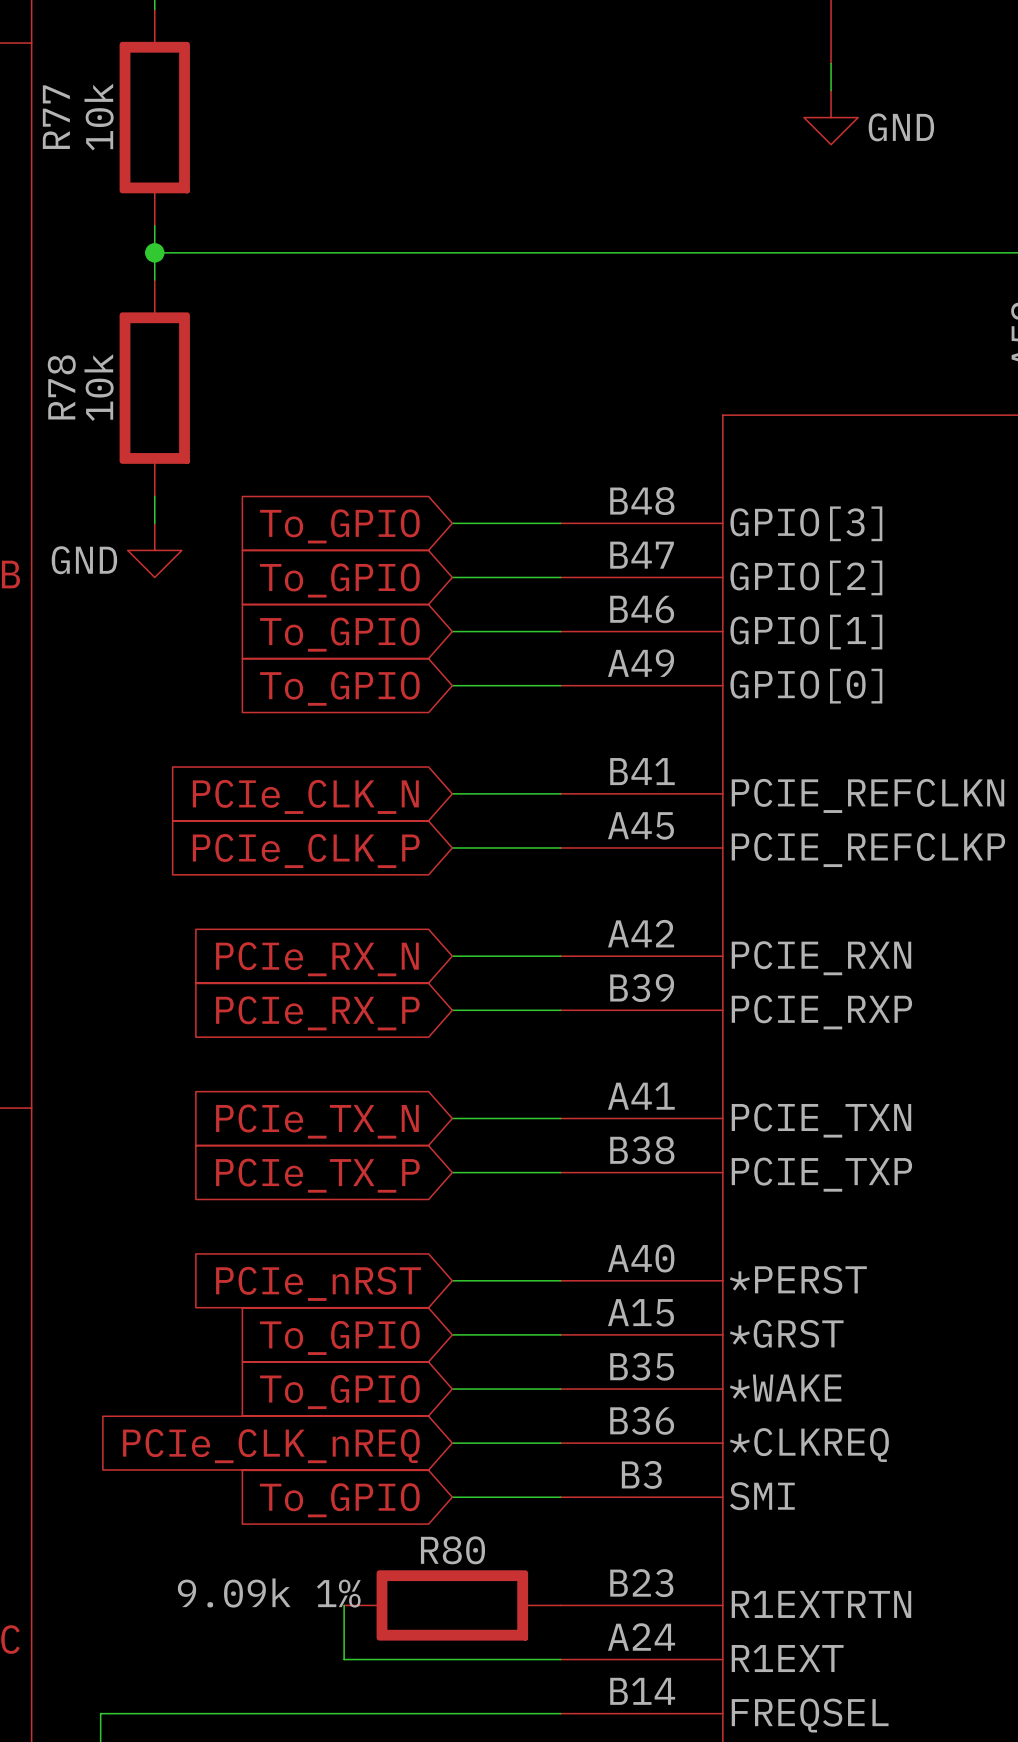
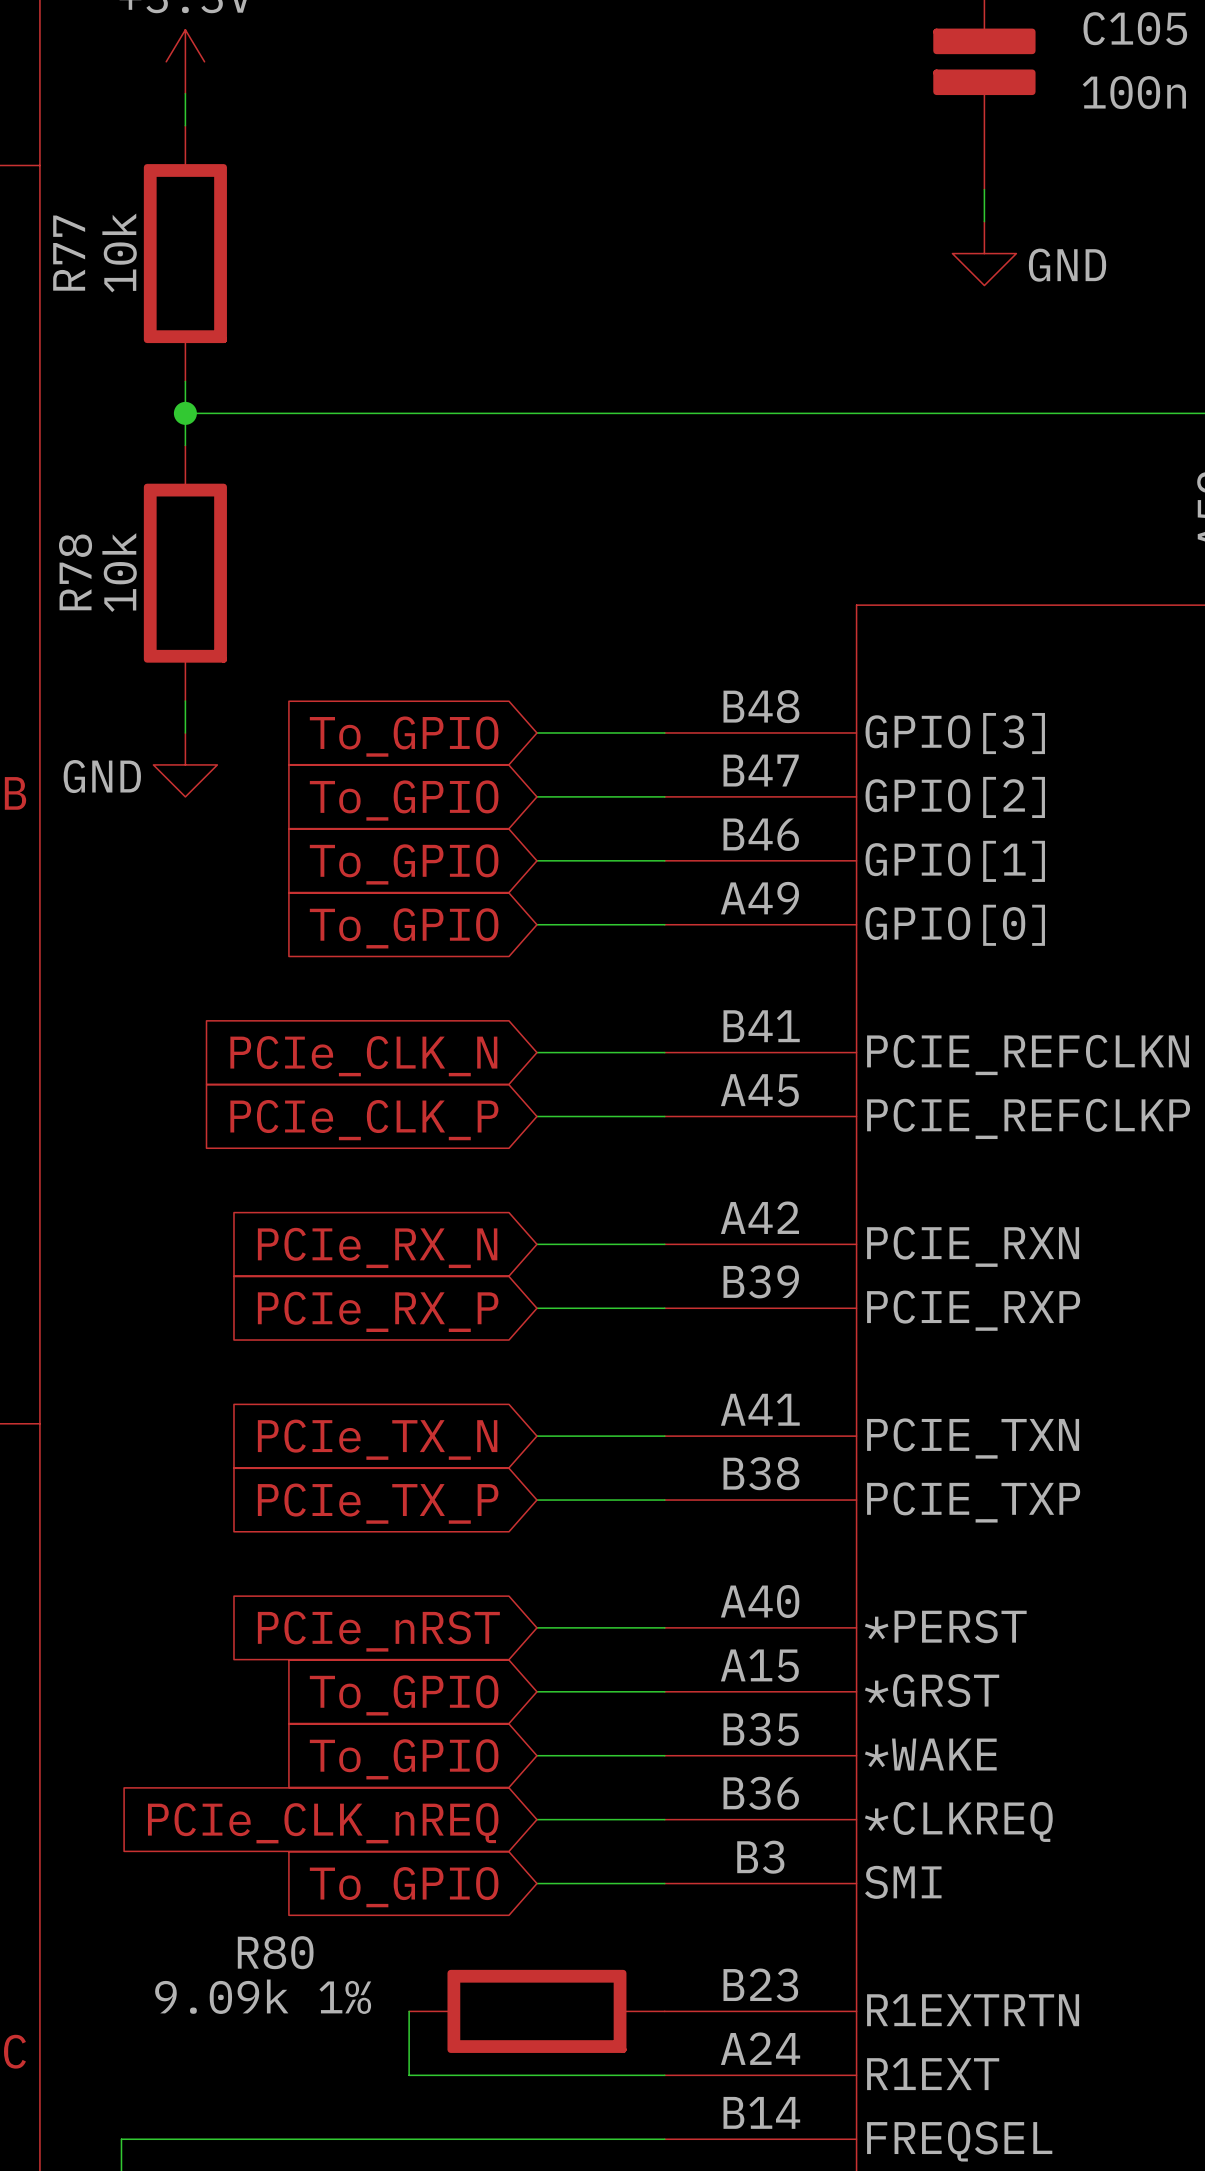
R80 name position: R80 (452, 1550) -> R80 (275, 1952)
R80 value position: 9.09k 1% (269, 1593) -> 9.09k 1% (263, 1996)

